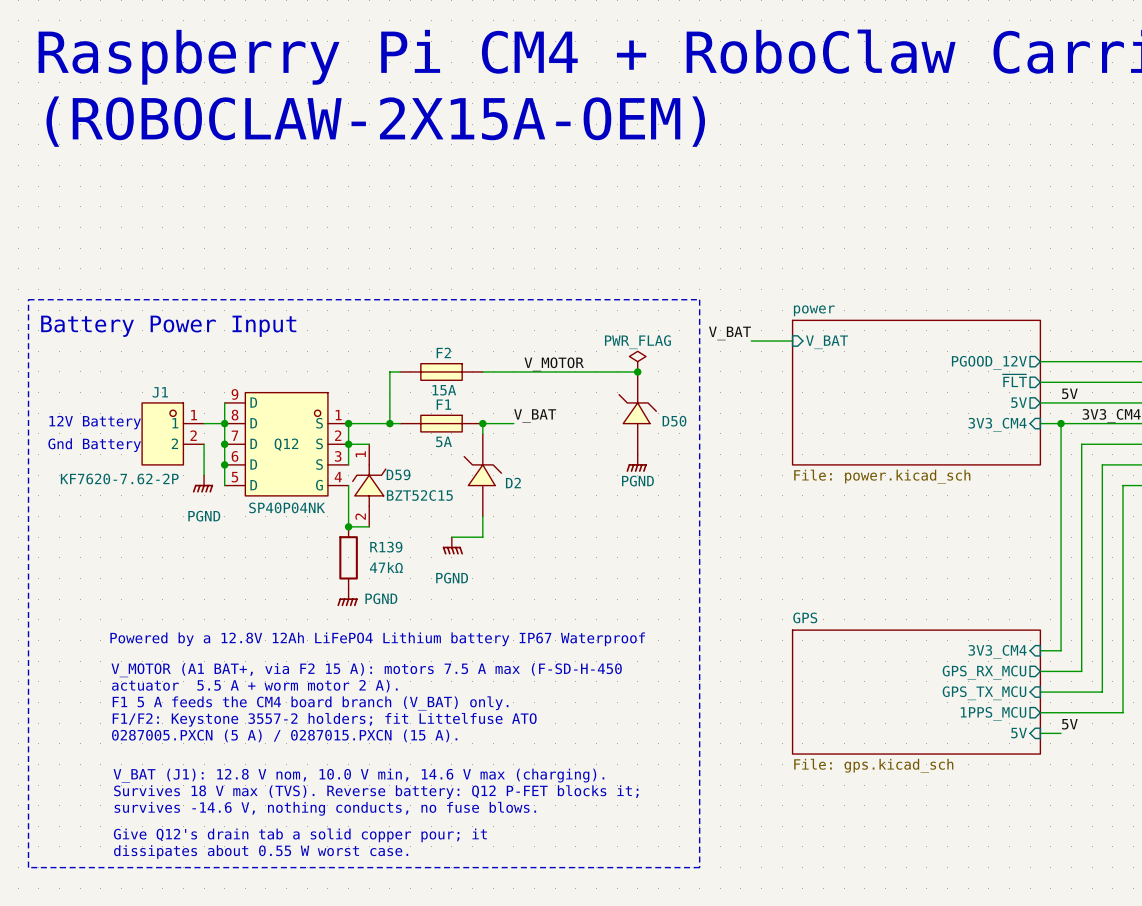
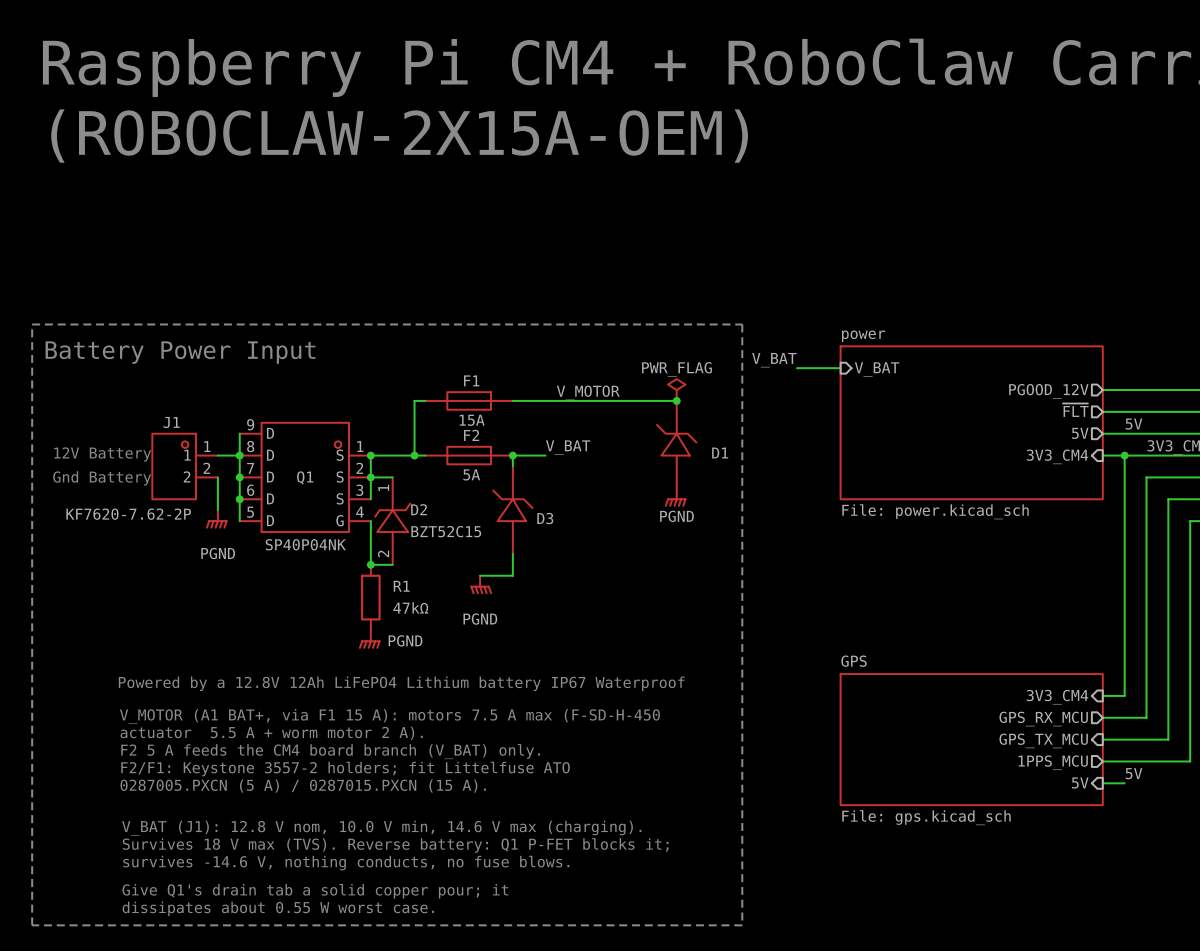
F2 name: F2 (443, 352) -> F1 (471, 380)
F1 name: F1 (443, 404) -> F2 (471, 435)
D50 name: D50 (674, 421) -> D1 (720, 452)
Q12 name: Q12 (286, 444) -> Q1 (305, 477)
D59 name: D59 (398, 474) -> D2 (419, 509)
D2 name: D2 (513, 483) -> D3 (545, 518)
R139 name: R139 (386, 547) -> R1 (401, 586)
text: V_MOTOR (A1 BAT+, via F2 15 A): motors 7.5 A max (F-SD-H-450 (366, 670) -> V_MOTOR (A1 BAT+, via F1 15 A): motors 7.5 A max (F-SD-H-450 (389, 716)
text: F1 5 A feeds the CM4 board branch (V_BAT) only. (310, 703) -> F2 5 A feeds the CM4 board branch (V_BAT) only. (330, 751)
text: F1/F2: Keystone 3557-2 holders; fit Littelfuse ATO (324, 719) -> F2/F1: Keystone 3557-2 holders; fit Littelfuse ATO (345, 768)
text: Survives 18 V max (TVS). Reverse battery: Q12 P-FET blocks it; (376, 792) -> Survives 18 V max (TVS). Reverse battery: Q1 P-FET blocks it; (395, 845)
text: Give Q12's drain tab a solid copper pour; it (300, 835) -> Give Q1's drain tab a solid copper pour; it (315, 891)

